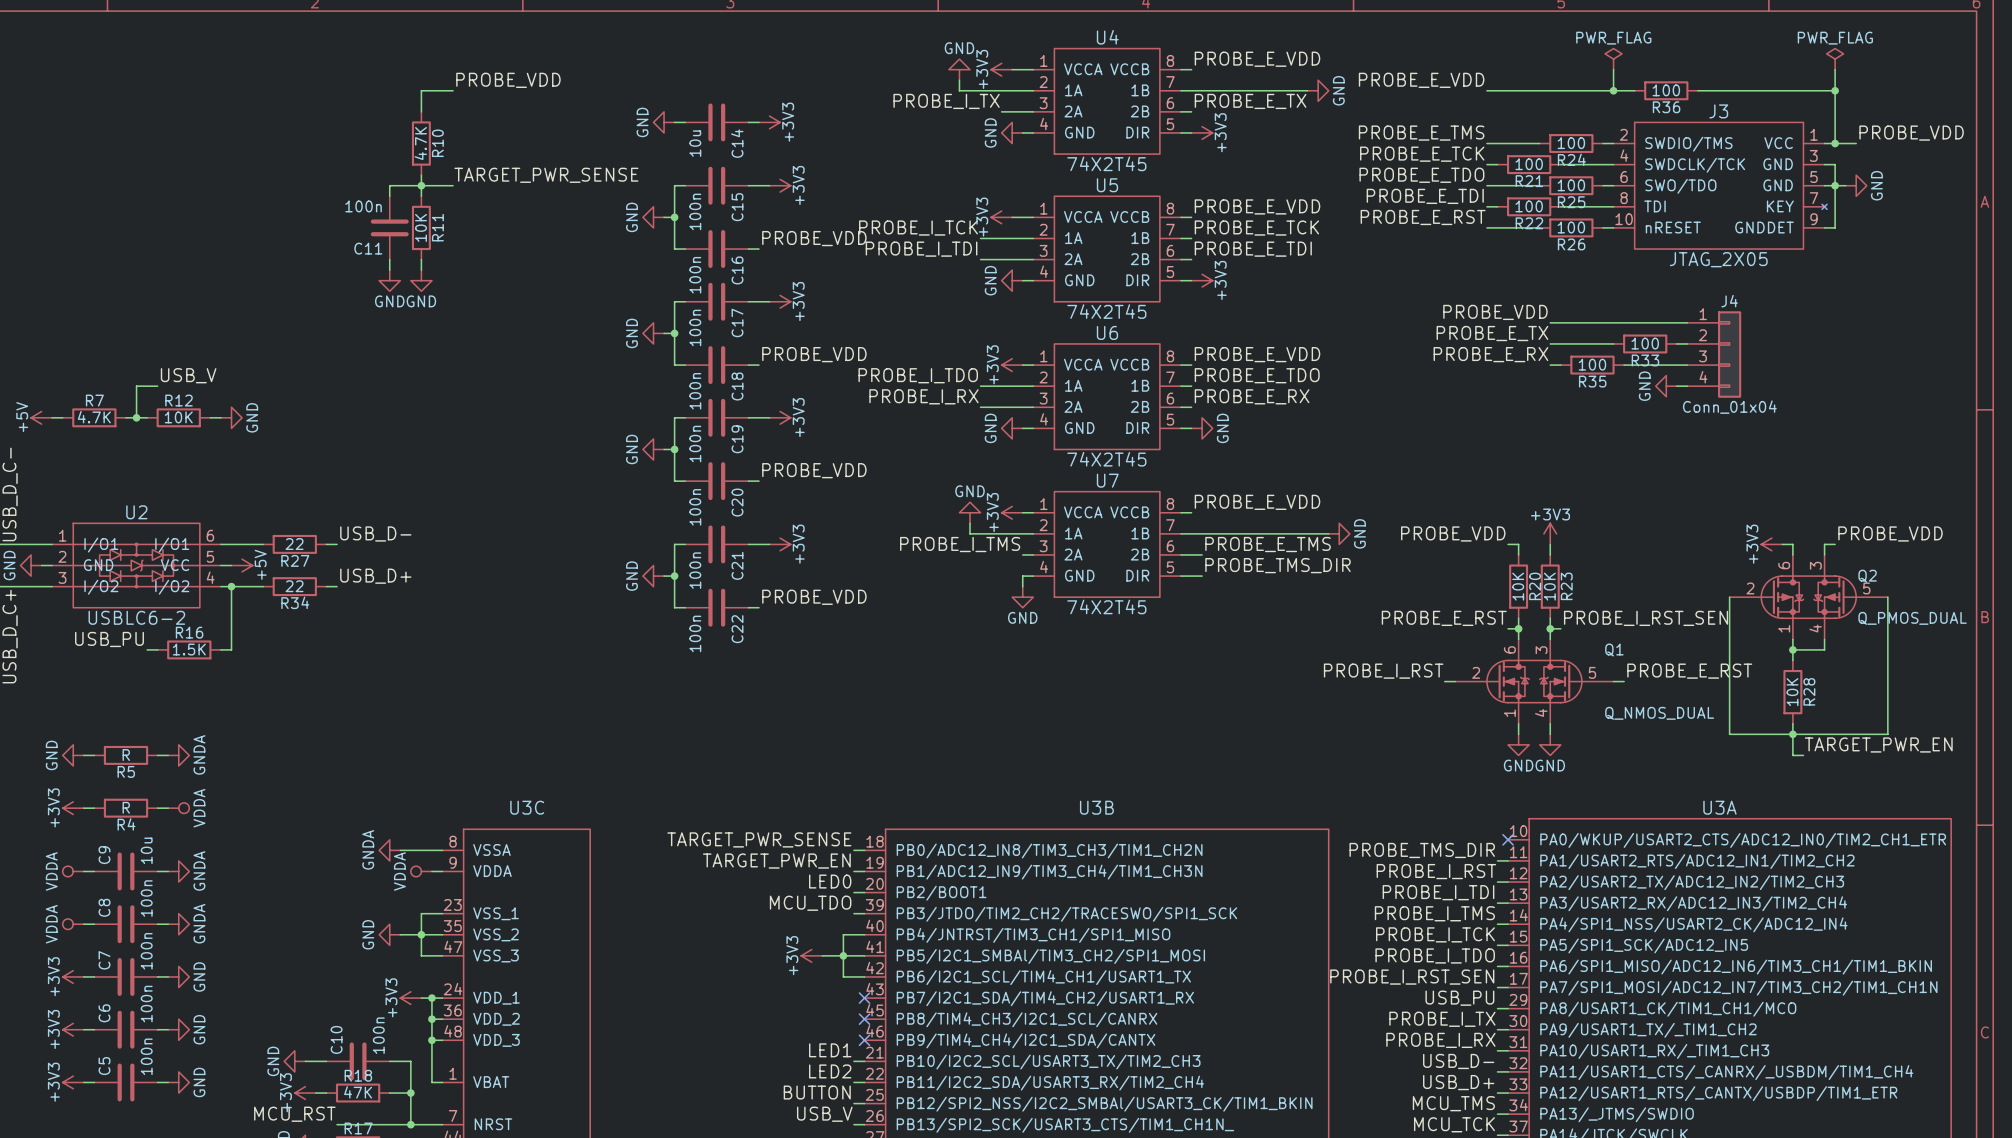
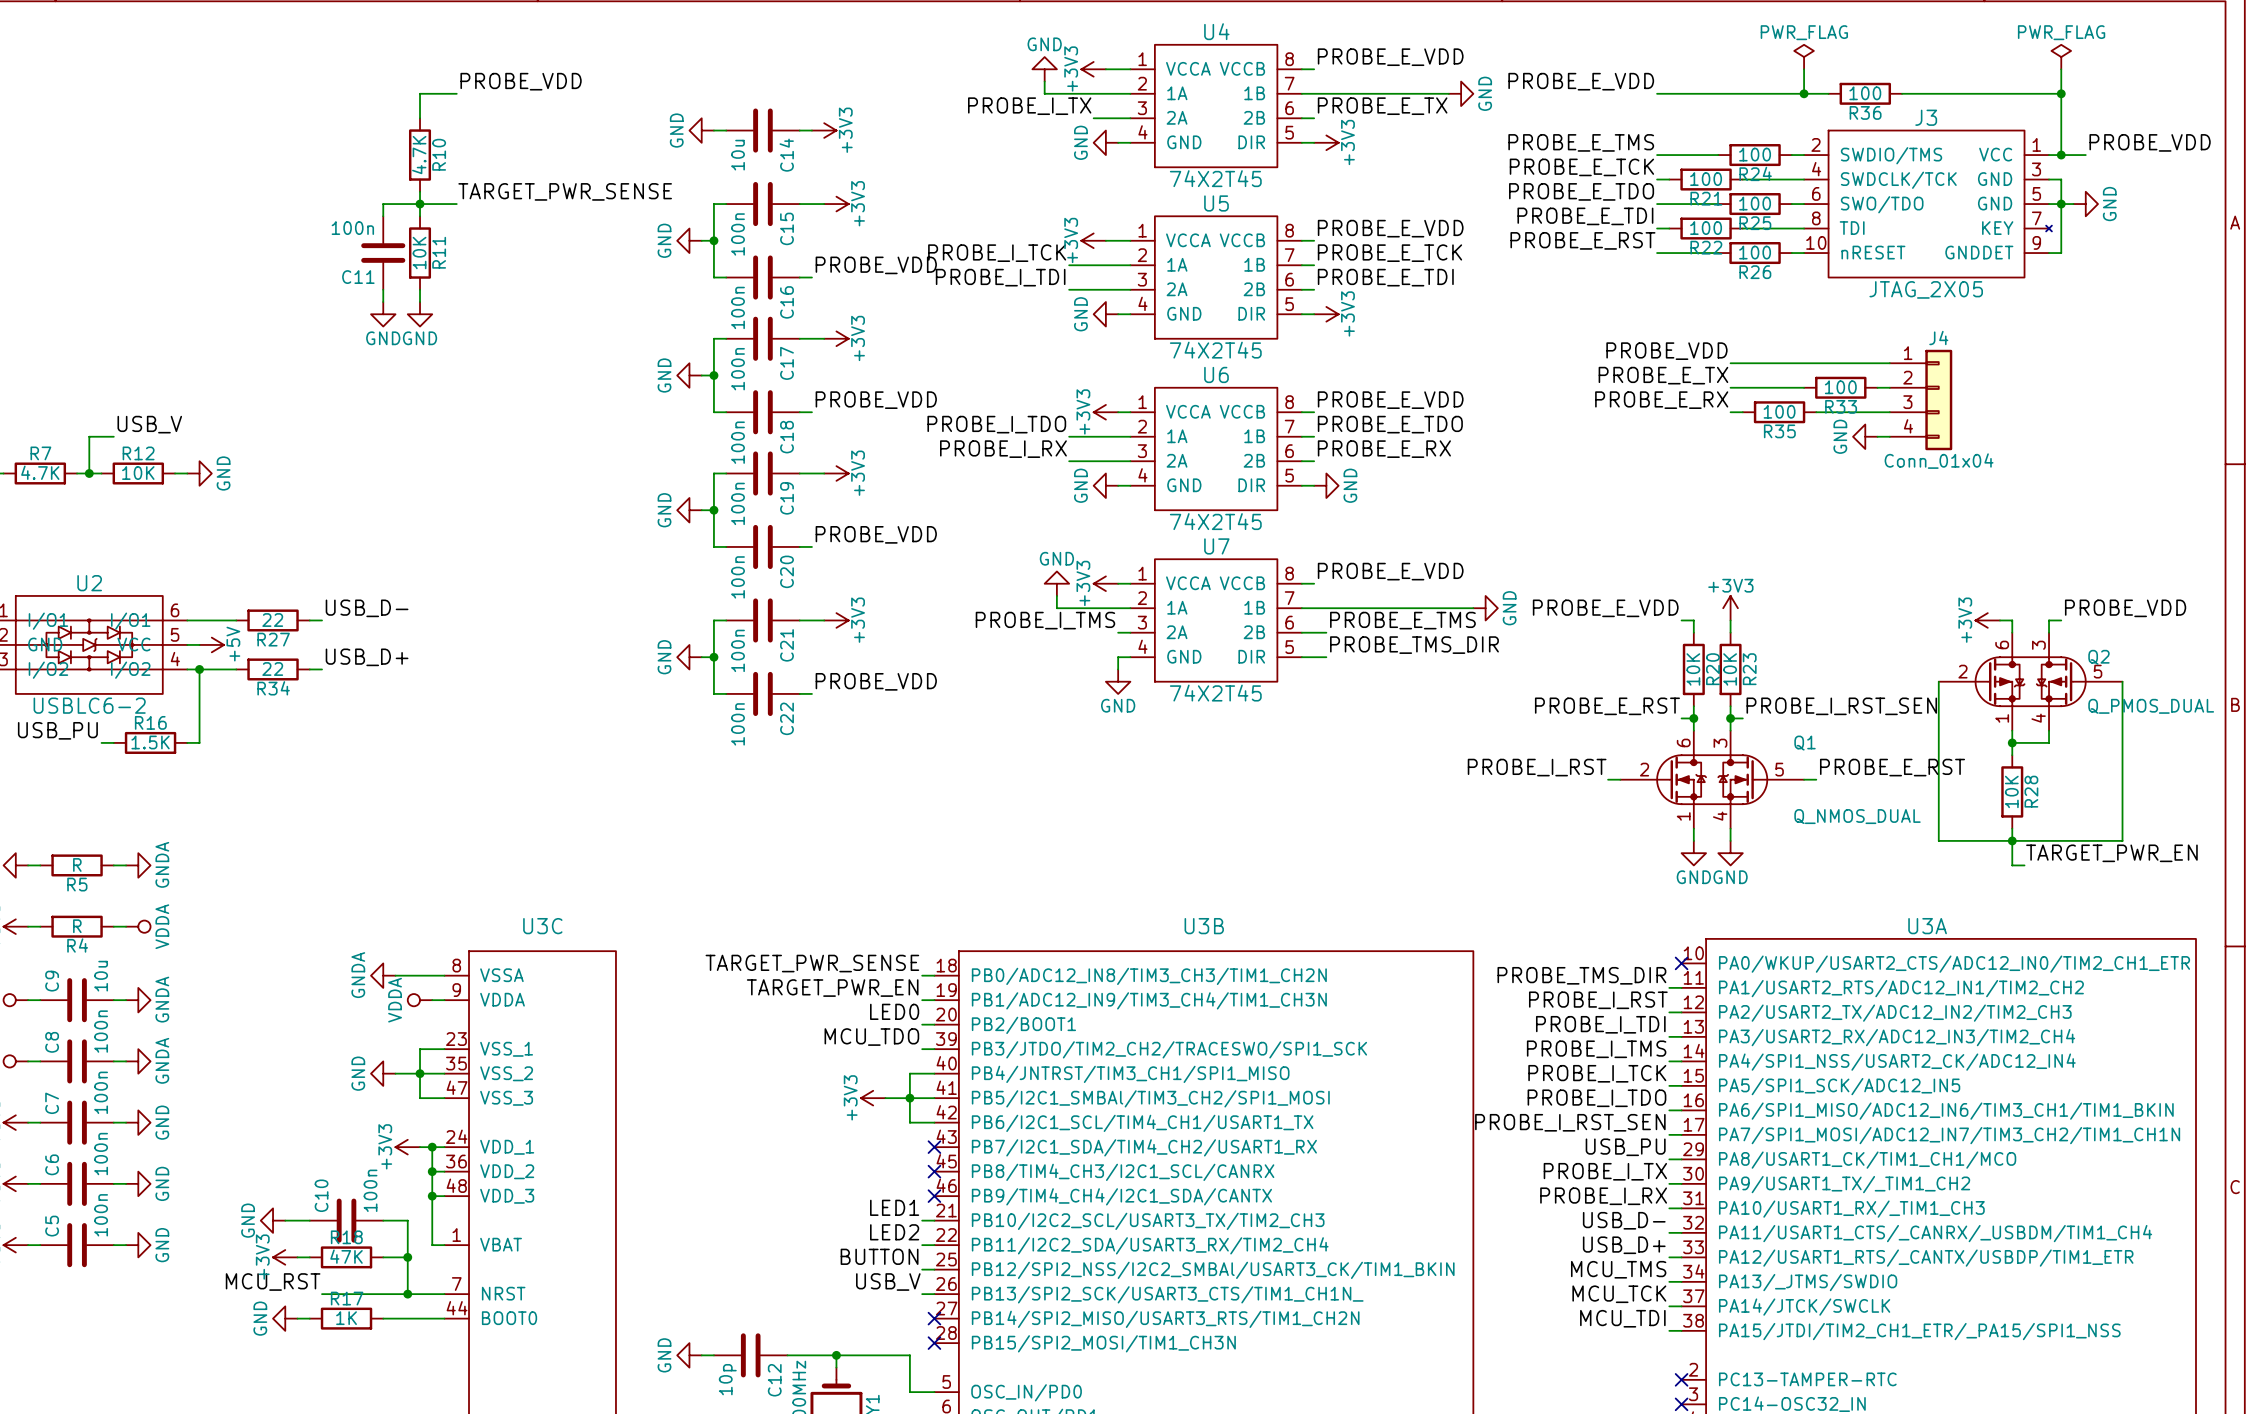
label: PROBE_VDD (1453, 533) -> PROBE_E_VDD (1605, 608)

